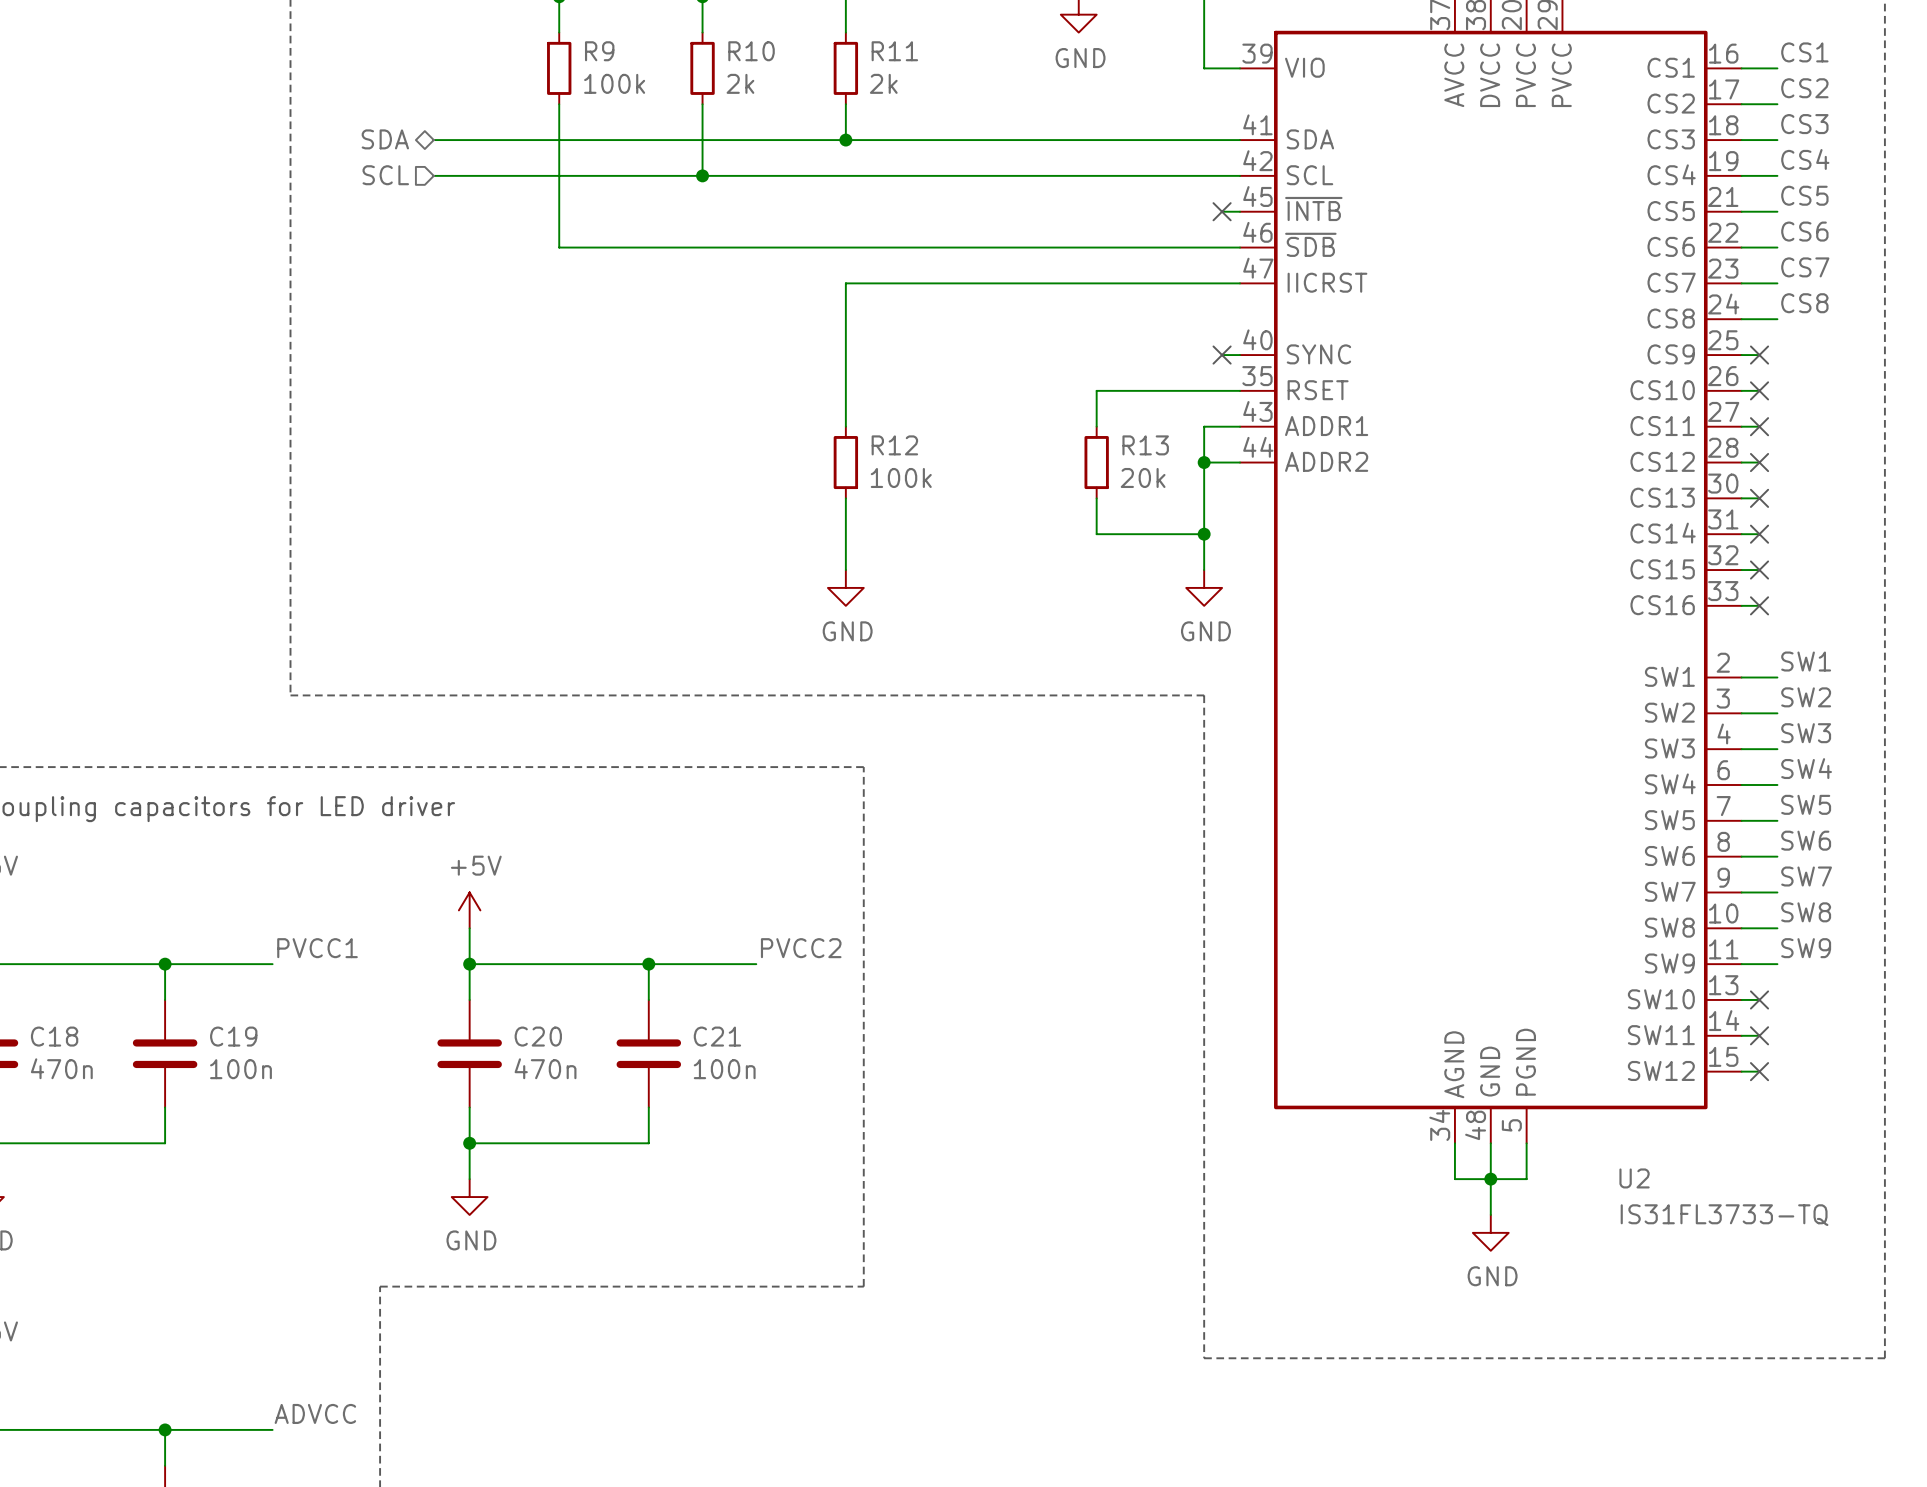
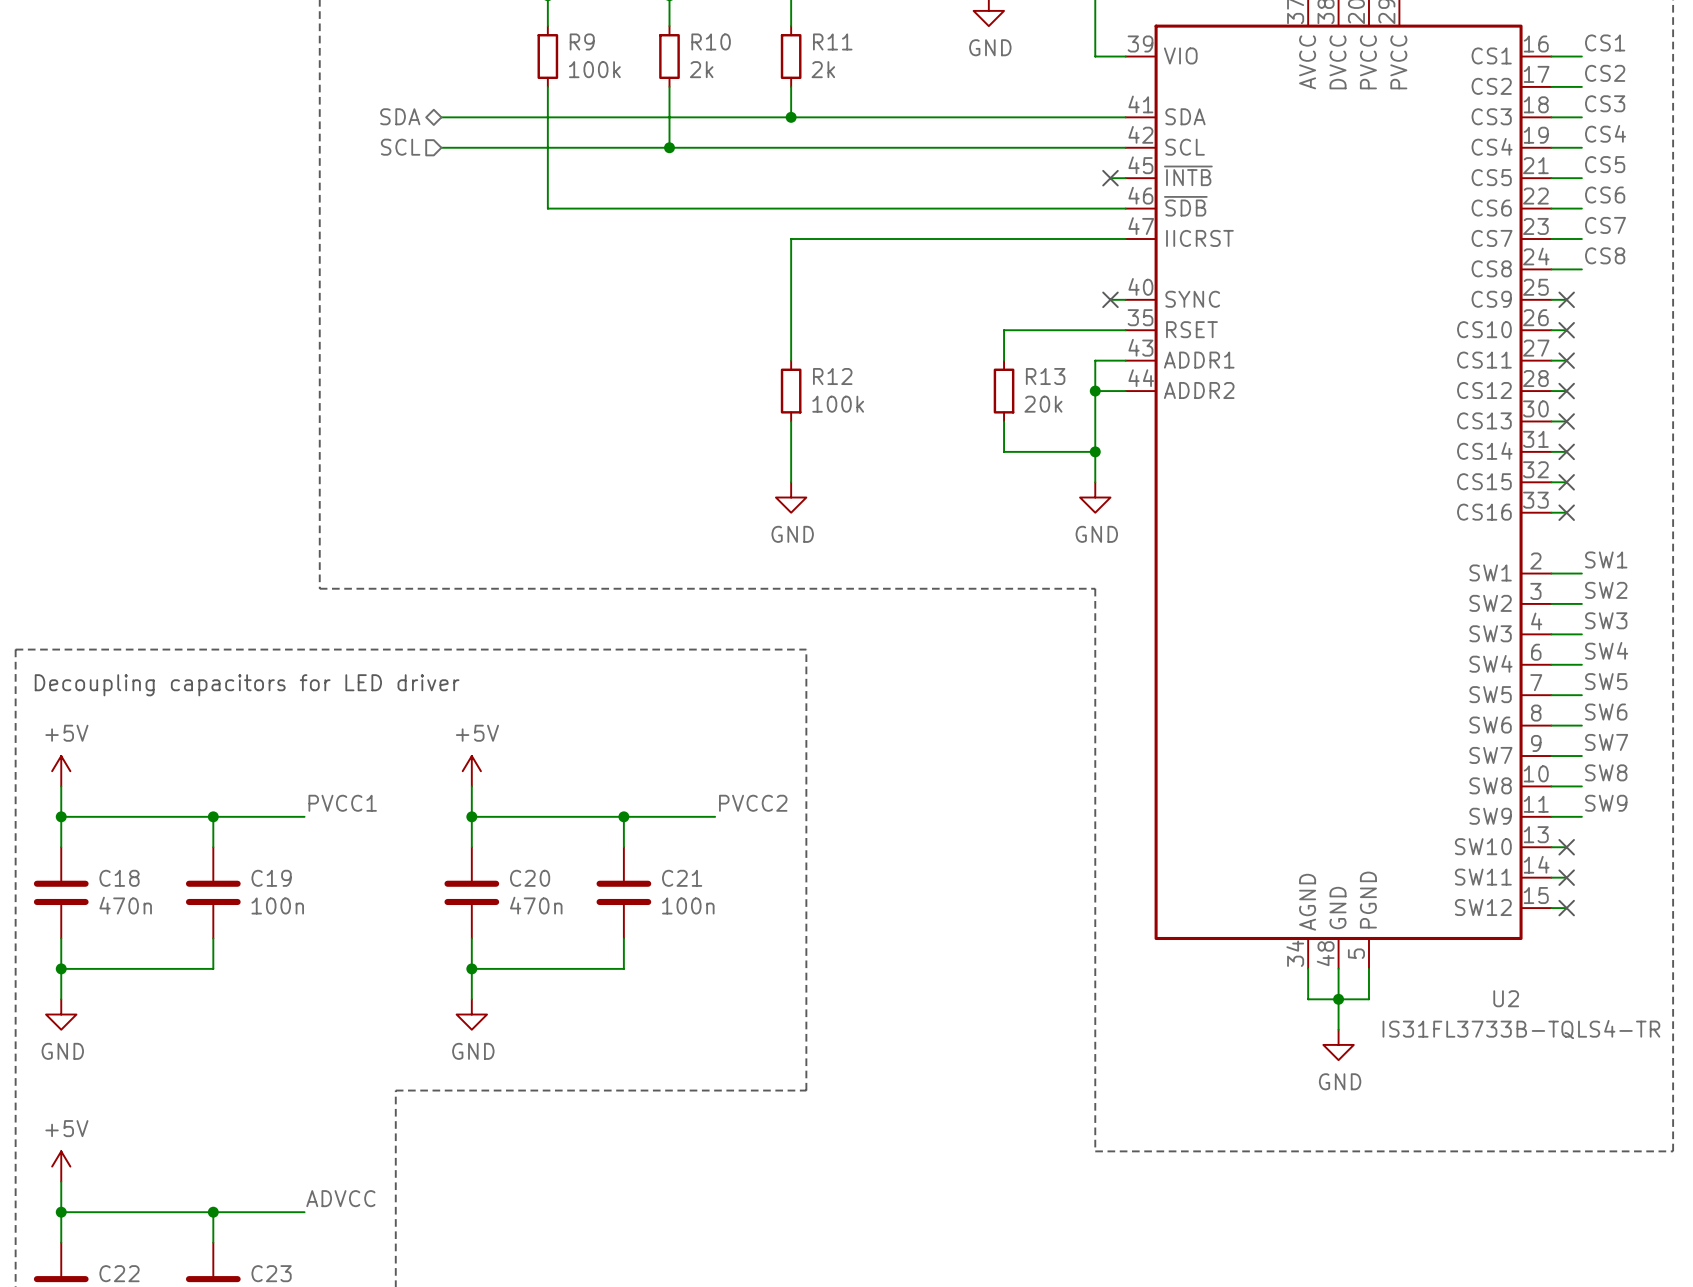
U2 name position: U2 (1634, 1178) -> U2 (1506, 998)
U2 value: IS31FL3733-TQ (1724, 1215) -> IS31FL3733B-TQLS4-TR (1521, 1029)

